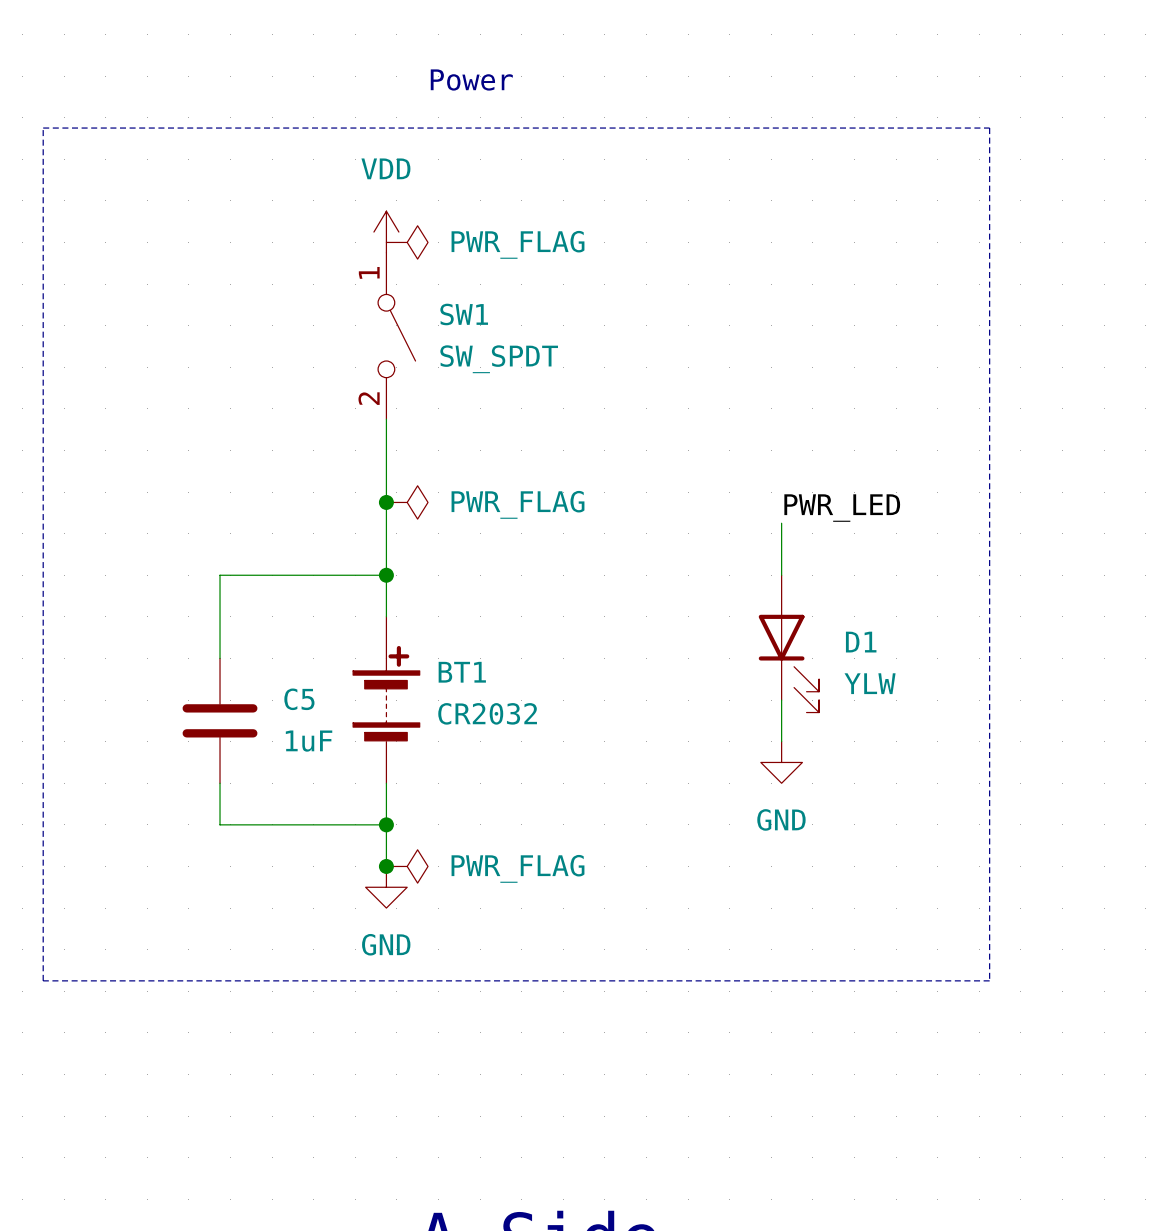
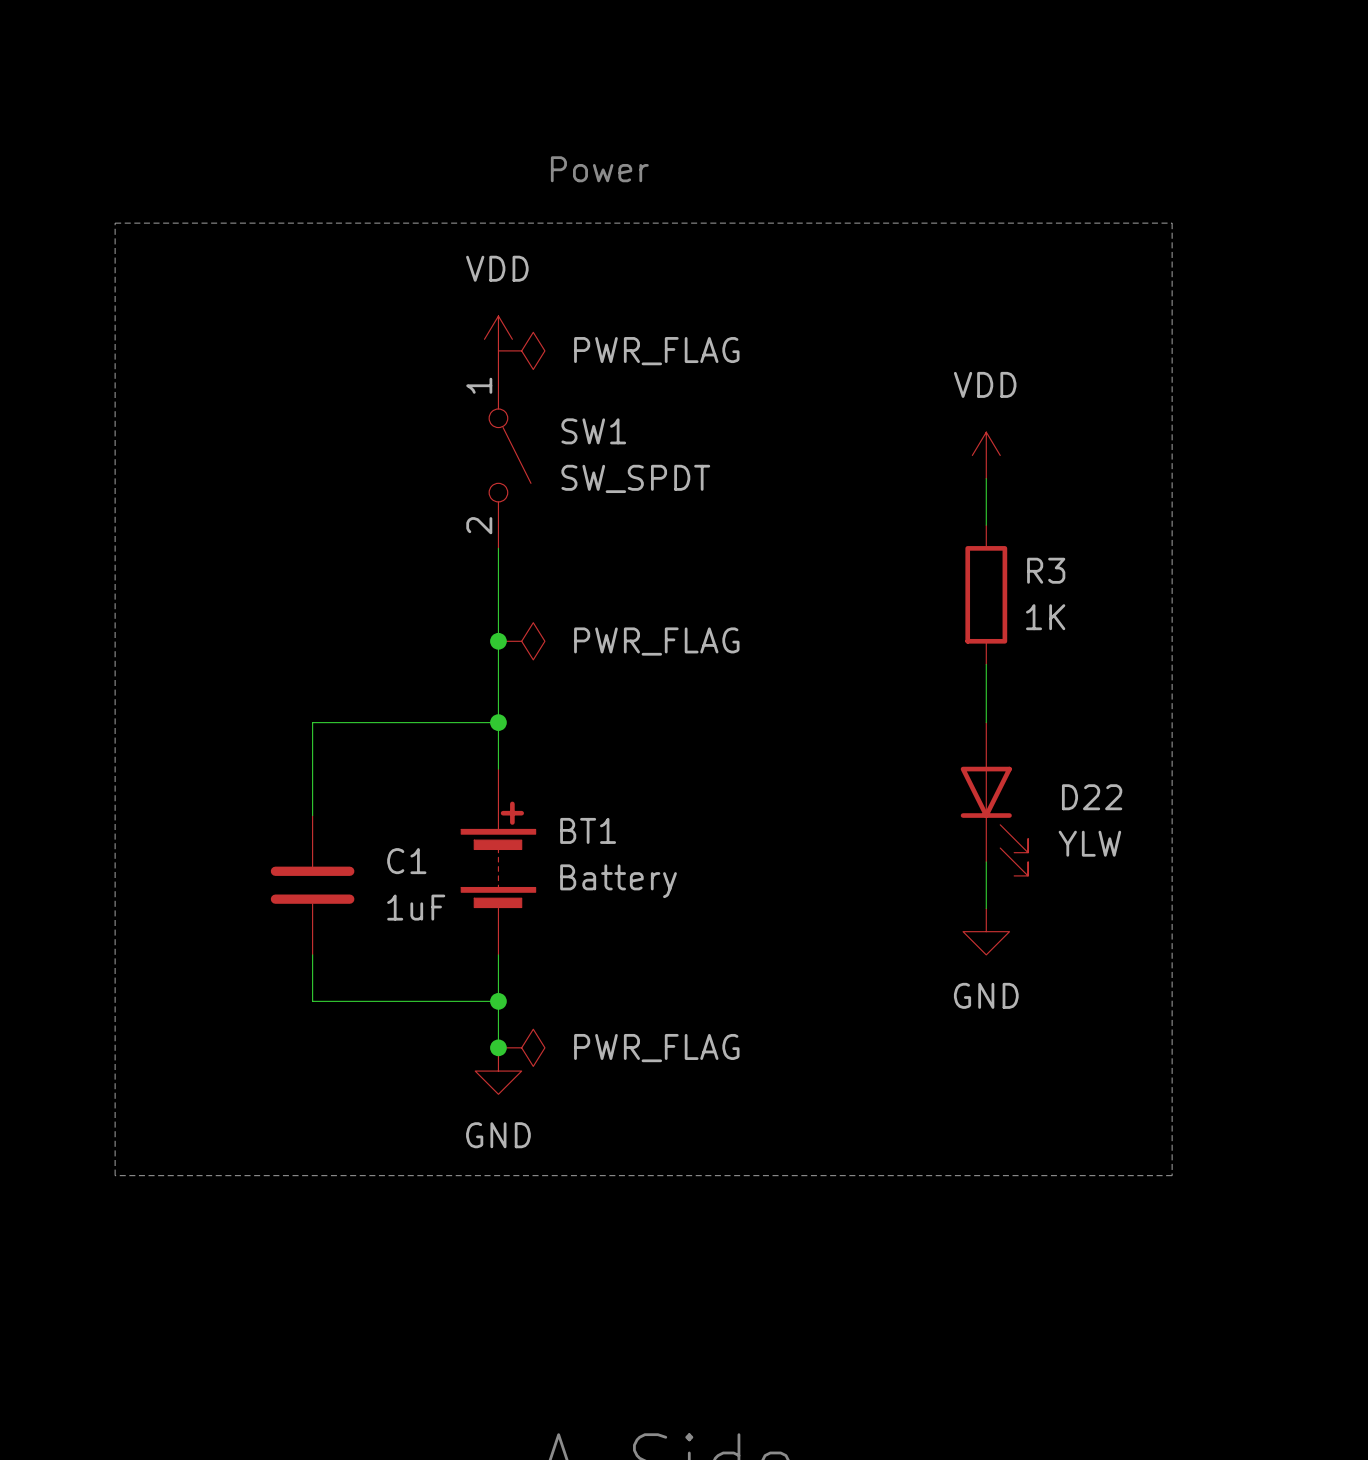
power symbol: none -> VDD (986, 455)
wire: none -> (986, 478) (986, 525)
R3: none -> 1K (986, 594)
label: PWR_LED (842, 508) -> none
wire: (781, 523) (781, 575) -> (986, 664) (986, 722)
D1: YLW (788, 643) -> none
D22: none -> YLW (994, 799)
C5 name: C5 (299, 699) -> C1 (406, 861)
wire: (781, 700) (781, 741) -> (986, 861) (986, 908)
BT1 value: CR2032 (487, 713) -> Battery (618, 881)
power symbol position: GND (781, 762) -> GND (986, 931)

